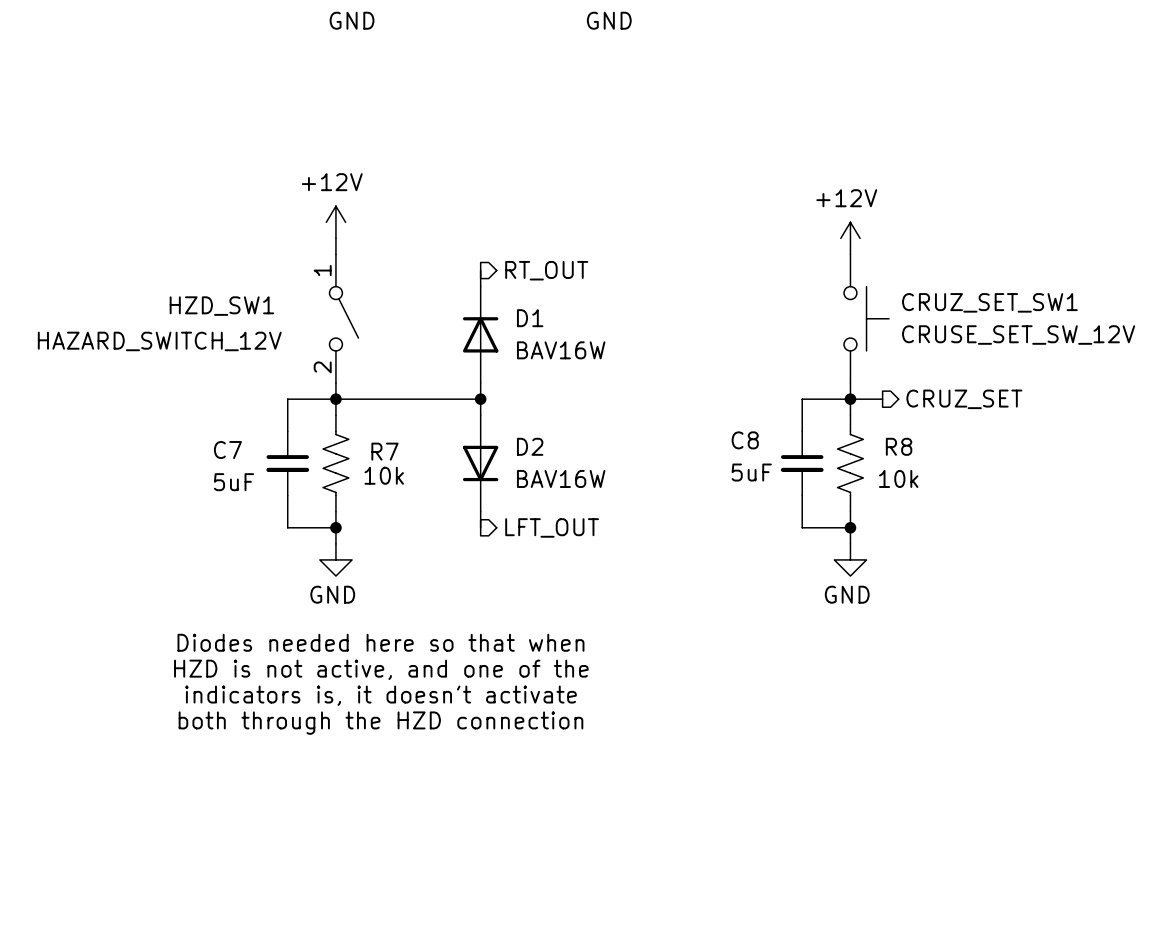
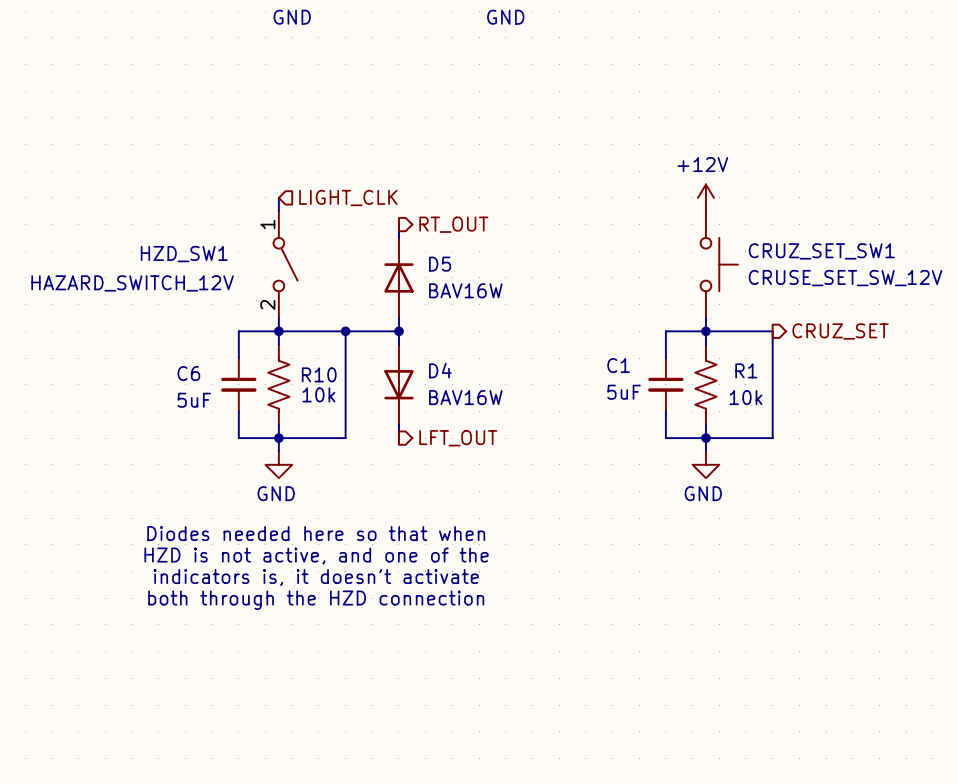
power symbol: +12V (335, 222) -> none
hierarchical label: none -> LIGHT_CLK (348, 198)
D1 name: D1 (530, 318) -> D5 (440, 264)
wire: none -> (345, 331) (345, 438) (278, 438)
junction: none -> (345, 331)
wire: none -> (732, 331) (772, 331) (772, 438) (705, 438)
hierarchical label position: CRUZ_SET (964, 399) -> CRUZ_SET (840, 331)
C8 name: C8 (745, 440) -> C1 (618, 365)
D2 name: D2 (530, 446) -> D4 (440, 370)
R8 name: R8 (899, 446) -> R1 (746, 370)
C7 name: C7 (227, 450) -> C6 (188, 373)
R7 name: R7 (384, 451) -> R10 (319, 374)

